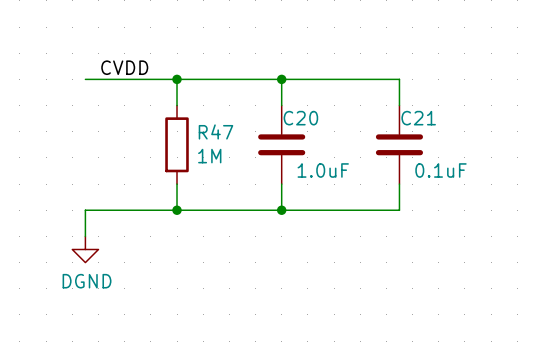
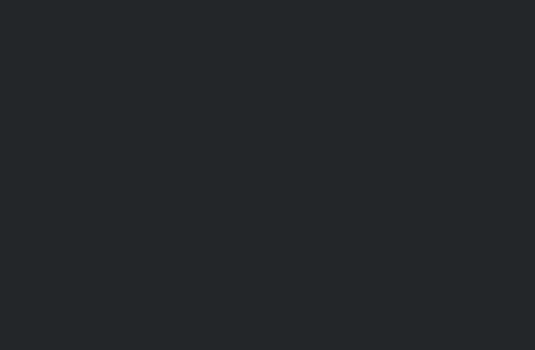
label: CVDD (124, 67) -> none
wire: (85, 79) (399, 79) (399, 105) -> none
wire: (177, 79) (177, 105) -> none
junction: (177, 79) -> none
wire: (281, 79) (281, 105) -> none
junction: (281, 79) -> none
R47: 1M (177, 144) -> none
C20: 1.0uF (281, 144) -> none
C21: 0.1uF (399, 144) -> none
wire: (177, 184) (177, 210) -> none
wire: (281, 184) (281, 210) -> none
wire: (399, 184) (399, 210) (85, 210) (85, 236) -> none
junction: (177, 210) -> none
junction: (281, 210) -> none
power symbol: DGND (85, 249) -> none

